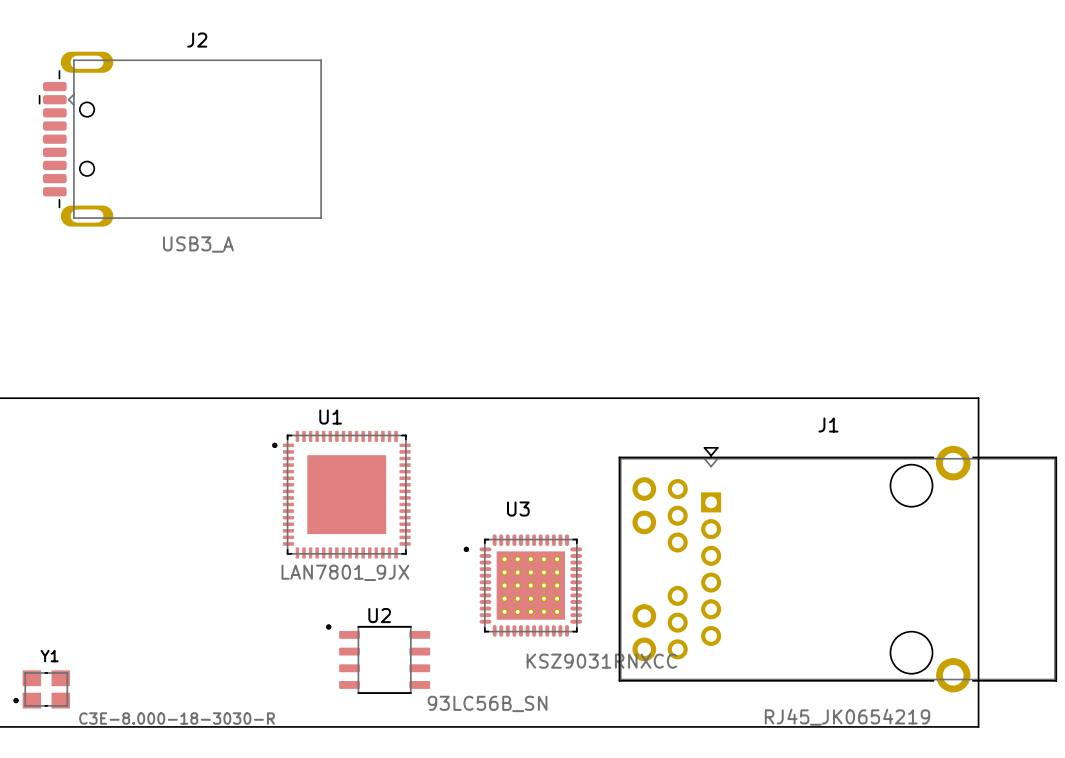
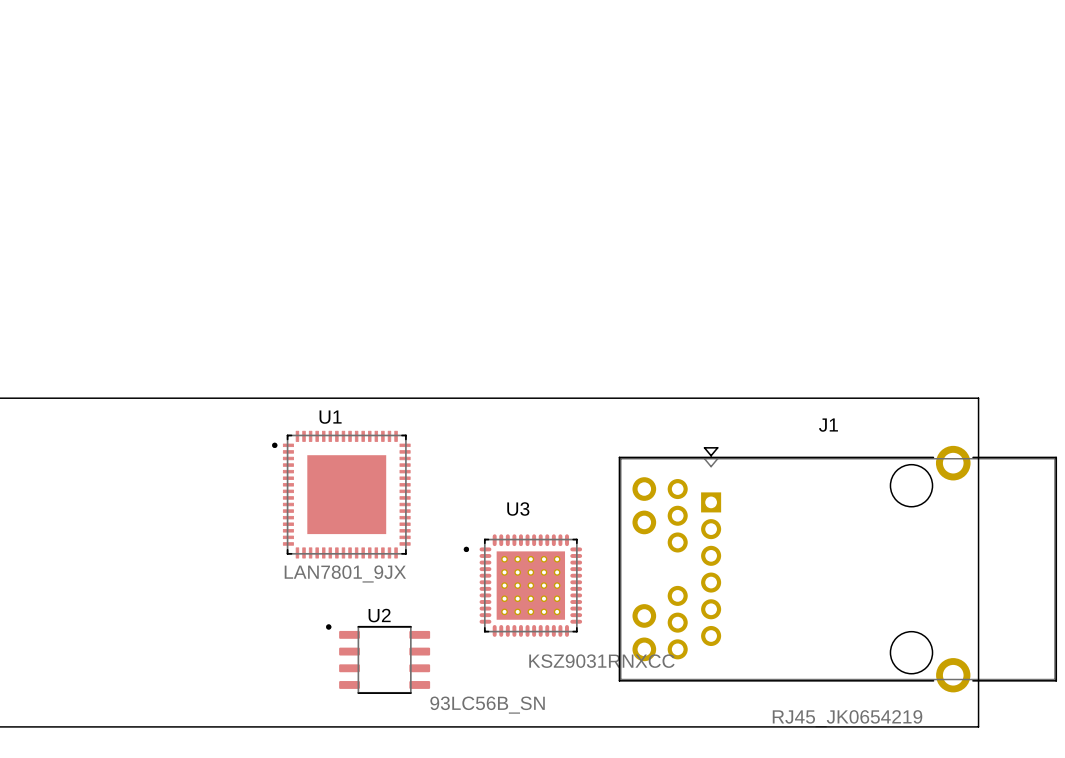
J2: USB3_A (180, 139) -> none
Y1: C3E-8.000-18-3030-R (41, 689) -> none

